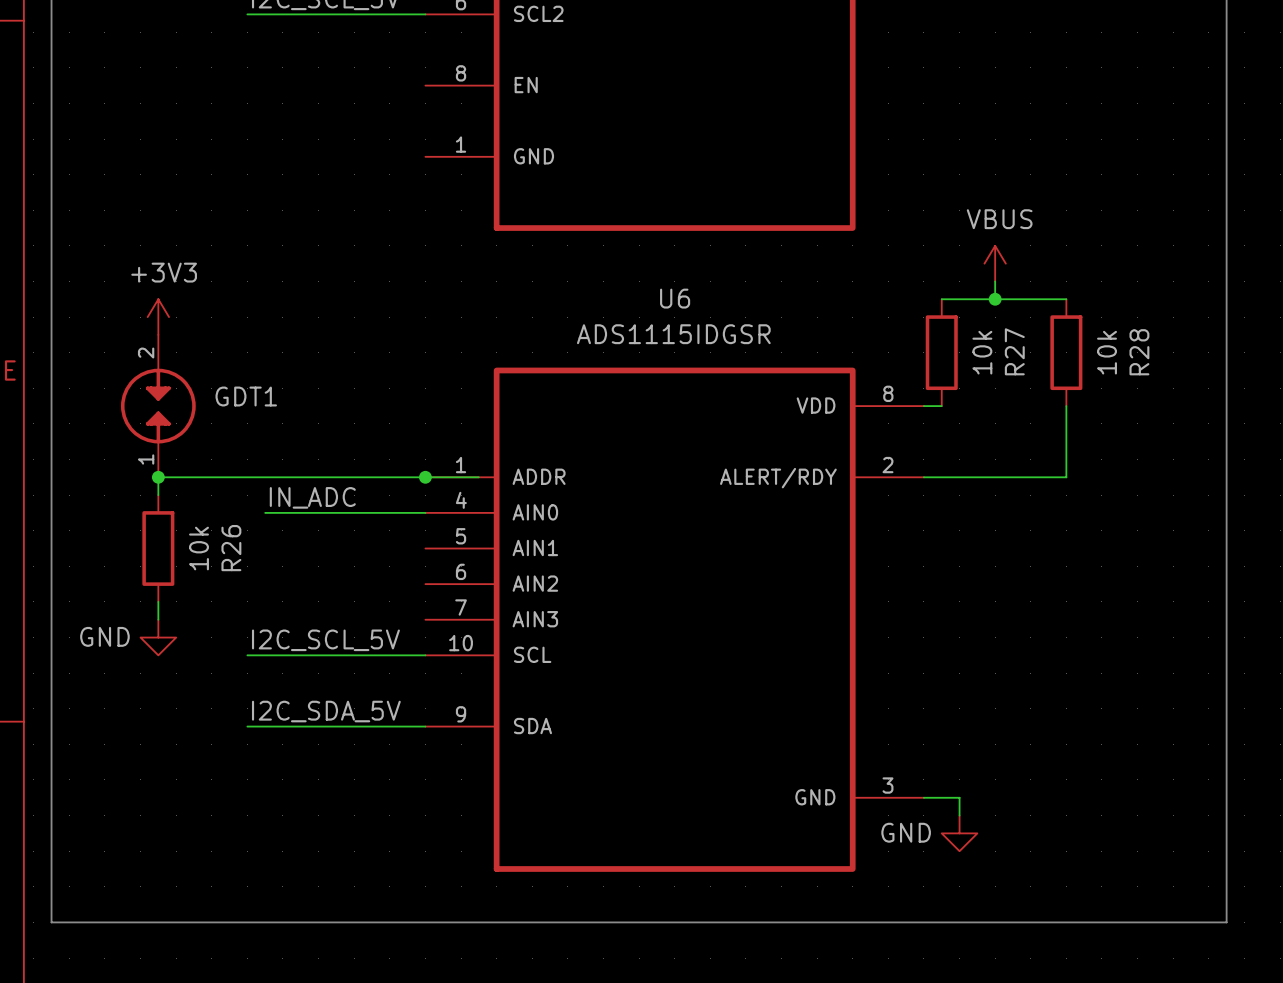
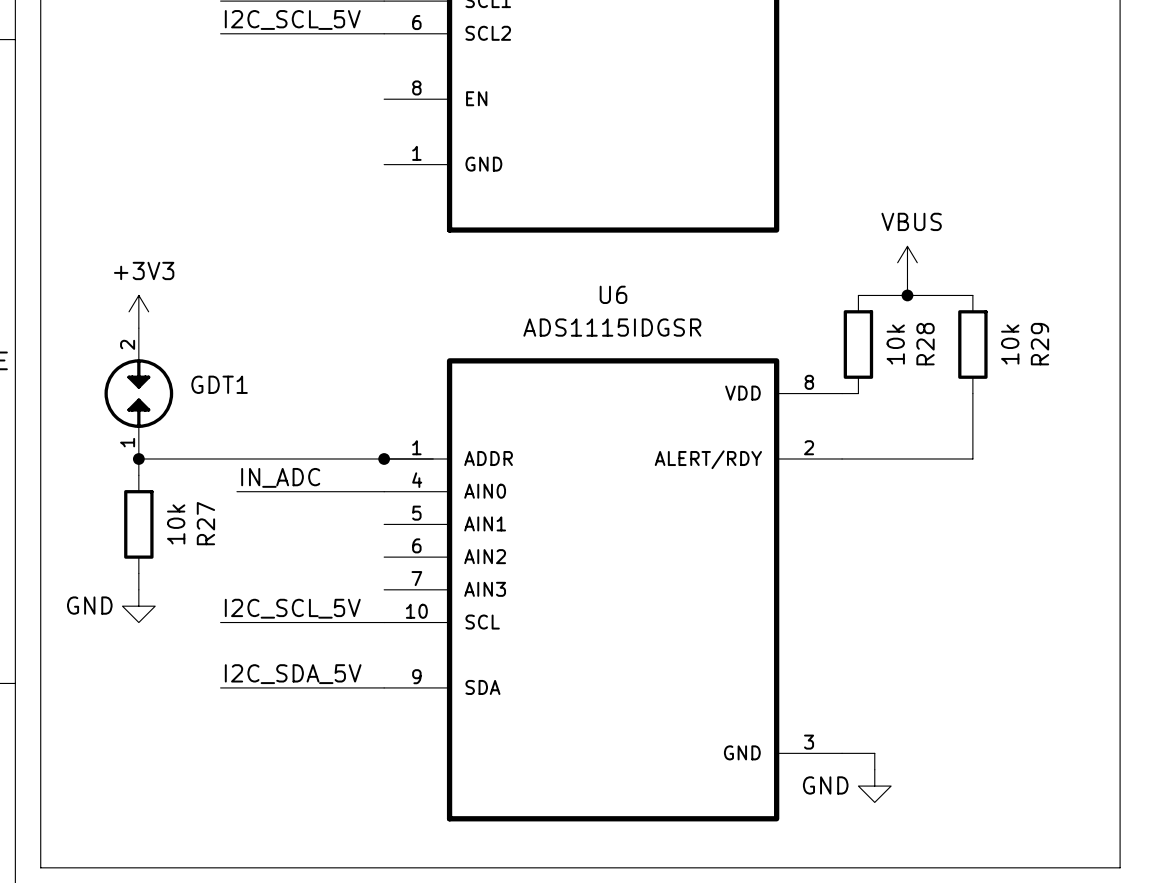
R27 name: R27 (1014, 351) -> R28 (925, 344)
R28 name: R28 (1139, 352) -> R29 (1039, 344)
R26 name: R26 (231, 548) -> R27 (205, 523)

